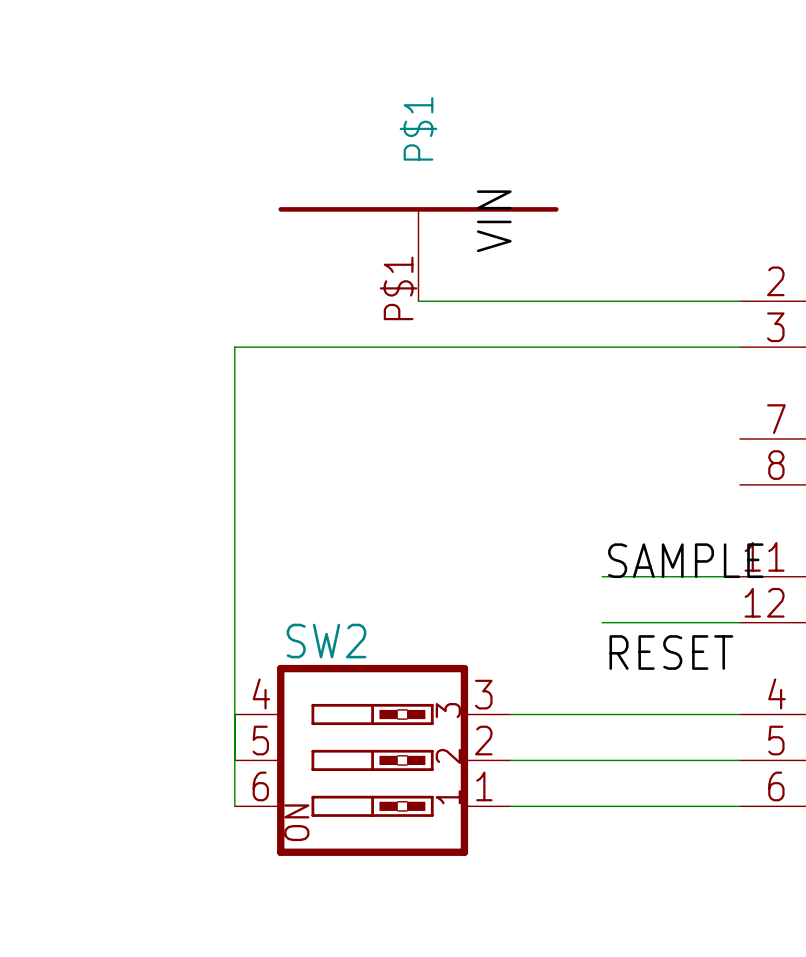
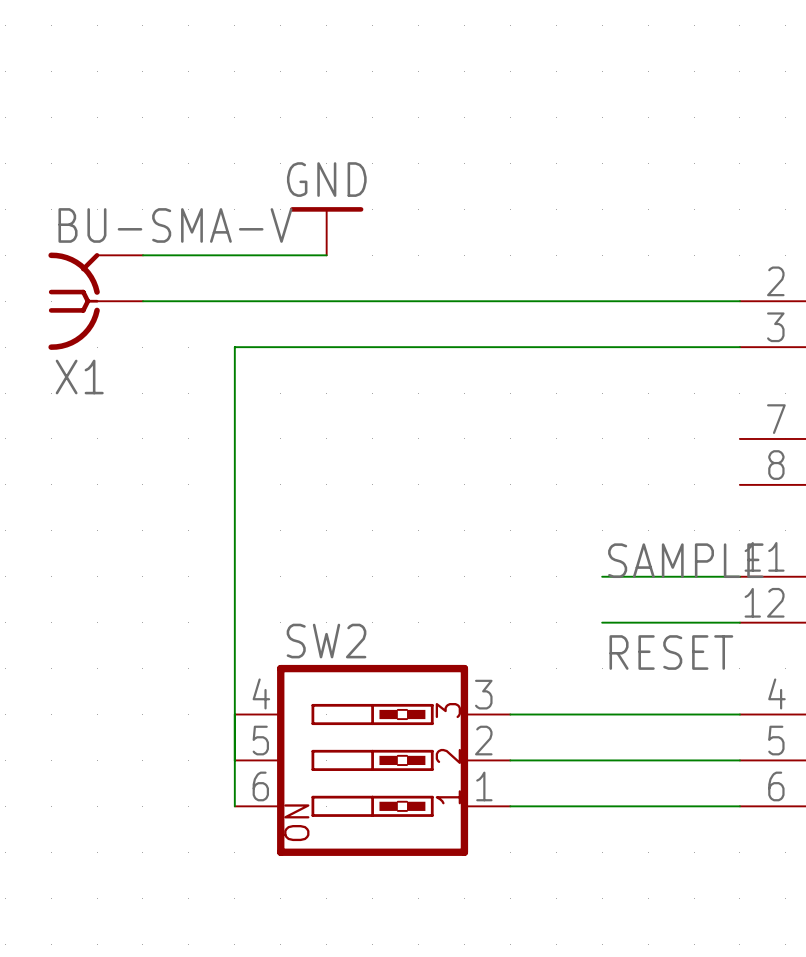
label: VIN (494, 221) -> none
power symbol: none -> GND (326, 231)
part: (418, 254) -> none
wire: none -> (142, 255) (326, 255)
X1: none -> BU-SMA-V (95, 301)
wire: none -> (142, 301) (418, 301)

